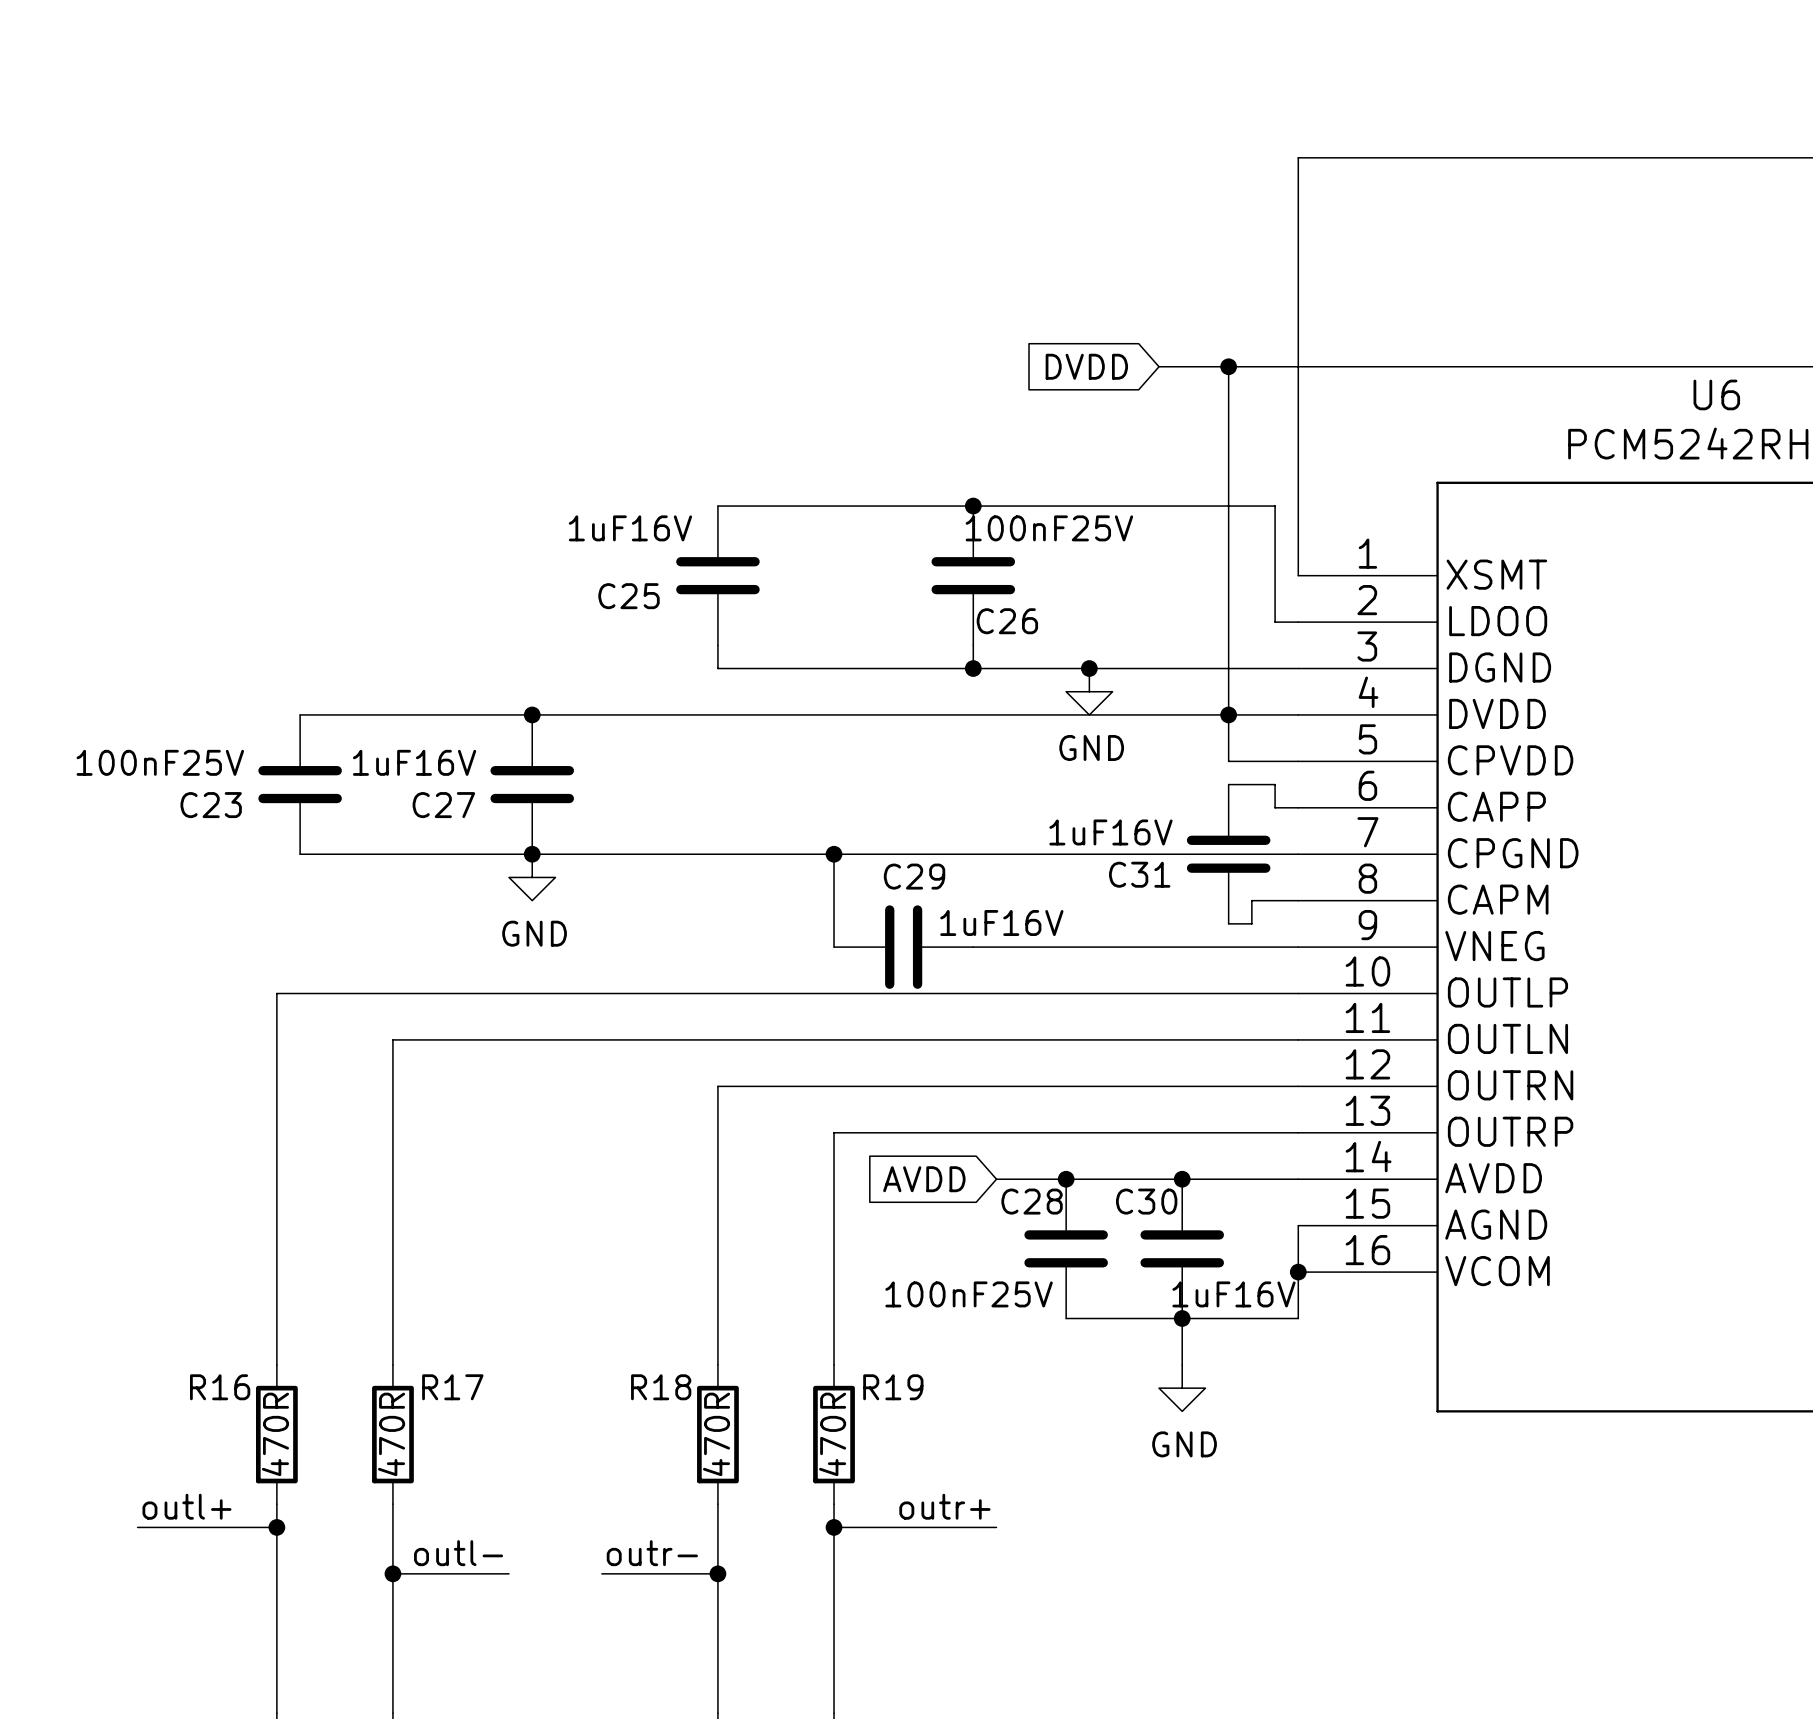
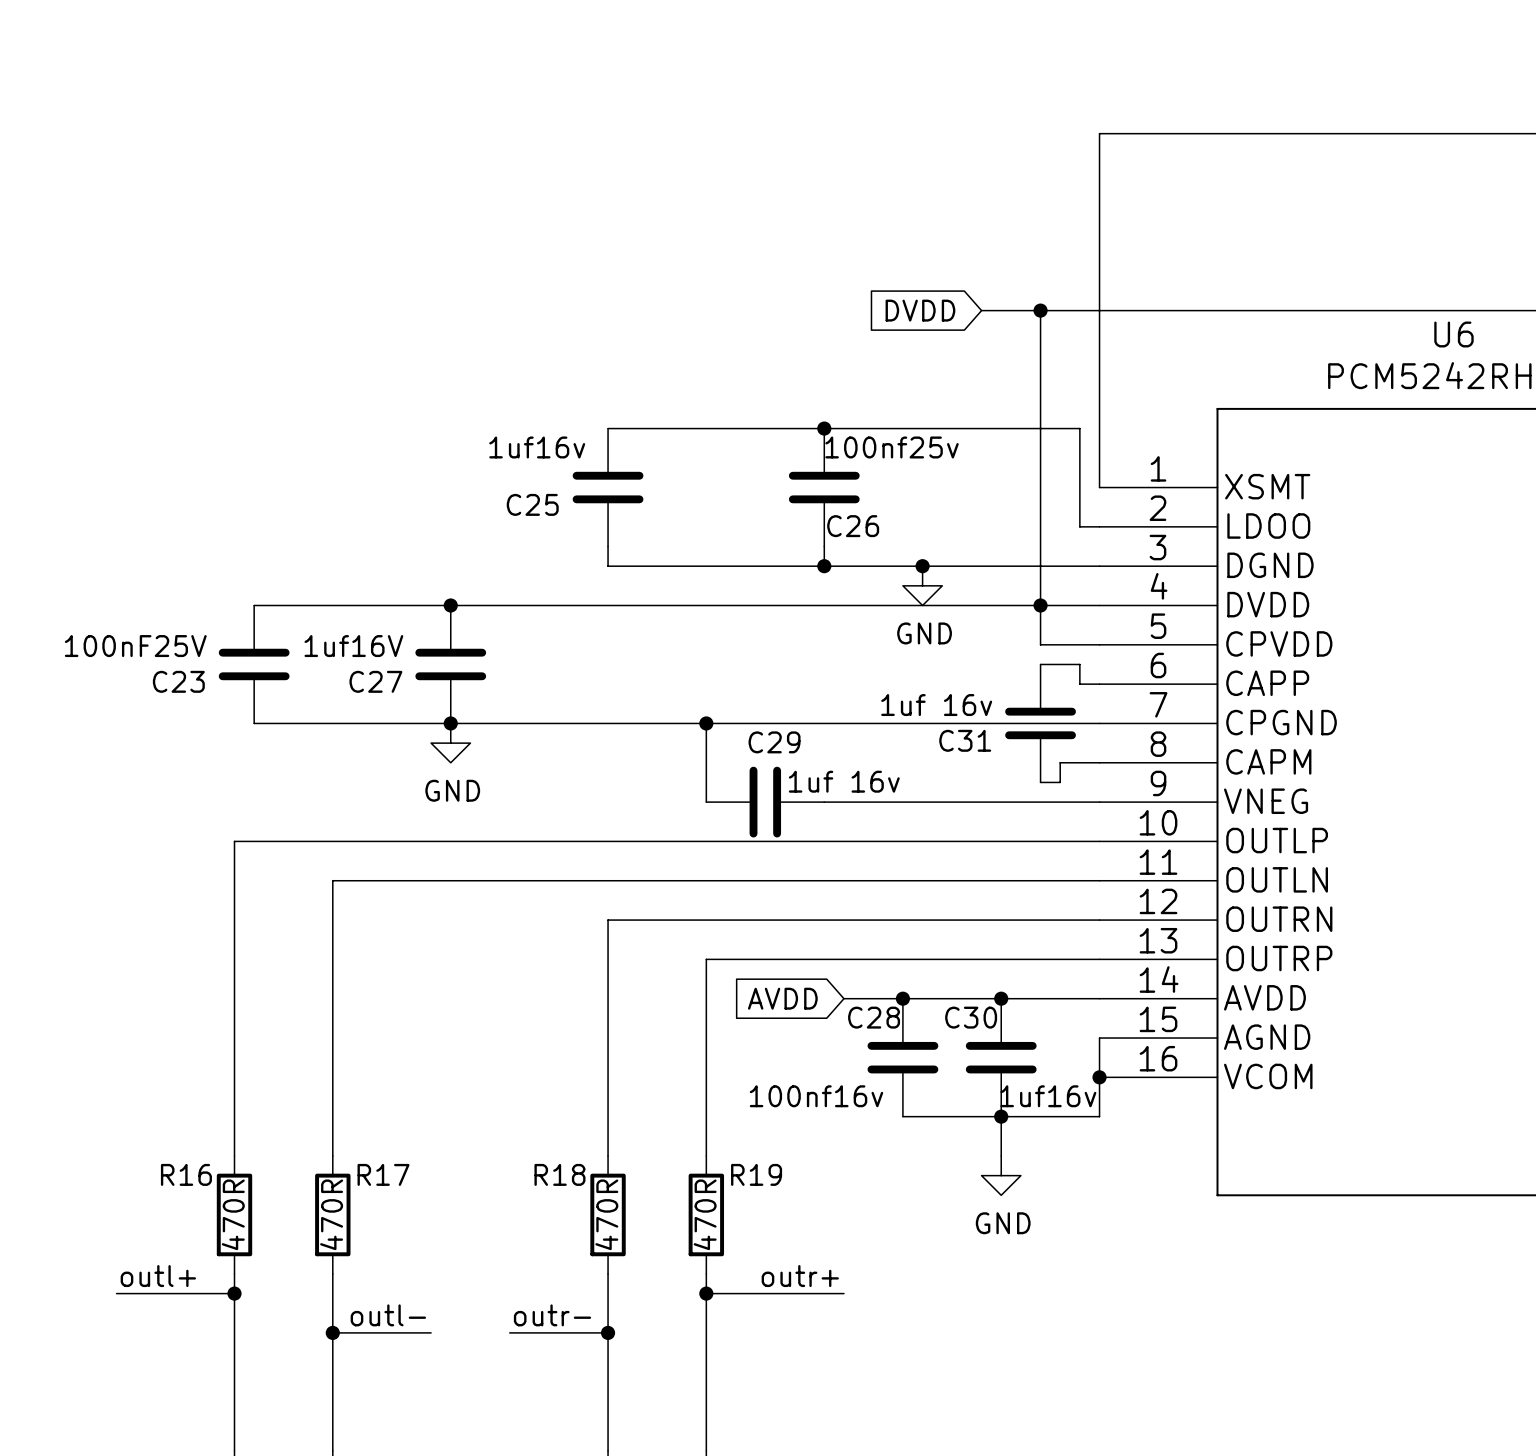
C25 value: 1uF16V (630, 528) -> 1uf16v (537, 447)
C26 value: 100nF25V (1049, 528) -> 100nf25v (892, 447)
C27 value: 1uF16V (414, 762) -> 1uf16V (353, 646)
C31 value: 1uF16V (1110, 832) -> 1uf 16v (936, 705)
C29 value: 1uF16V (1001, 923) -> 1uf 16v (844, 781)
C28 value: 100nF25V (969, 1294) -> 100nf16v (816, 1096)
C30 value: 1uF16V (1234, 1294) -> 1uf16v (1048, 1096)

